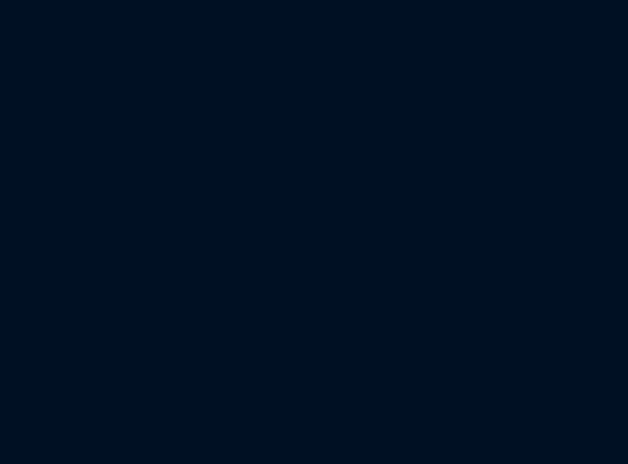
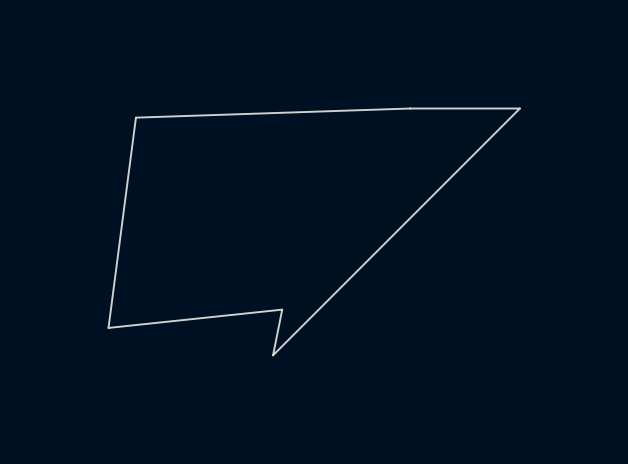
board edge: none -> (519, 108) (410, 108) (135, 117) (108, 327) (282, 309) (273, 355) (519, 108)

